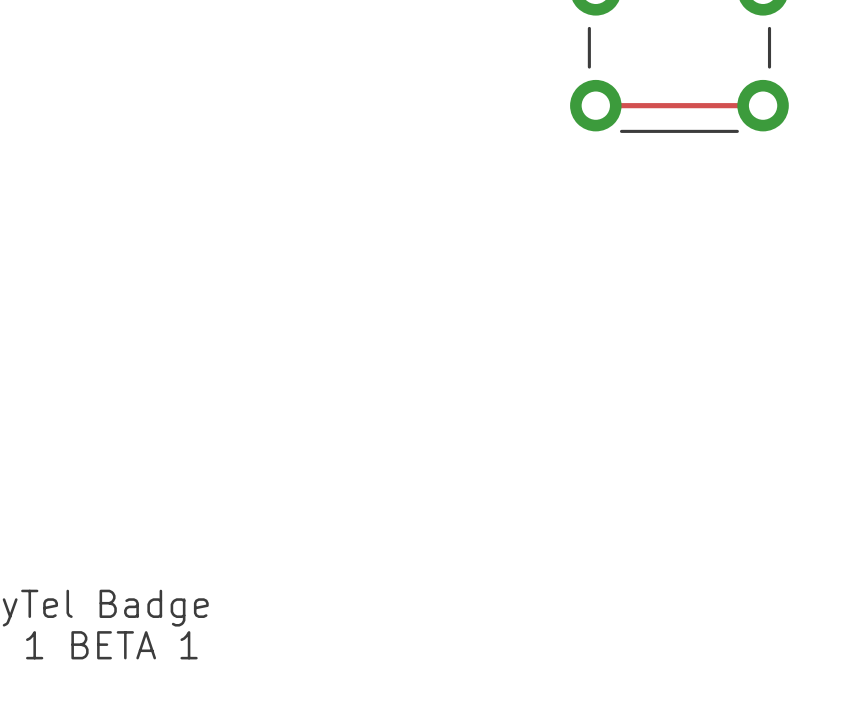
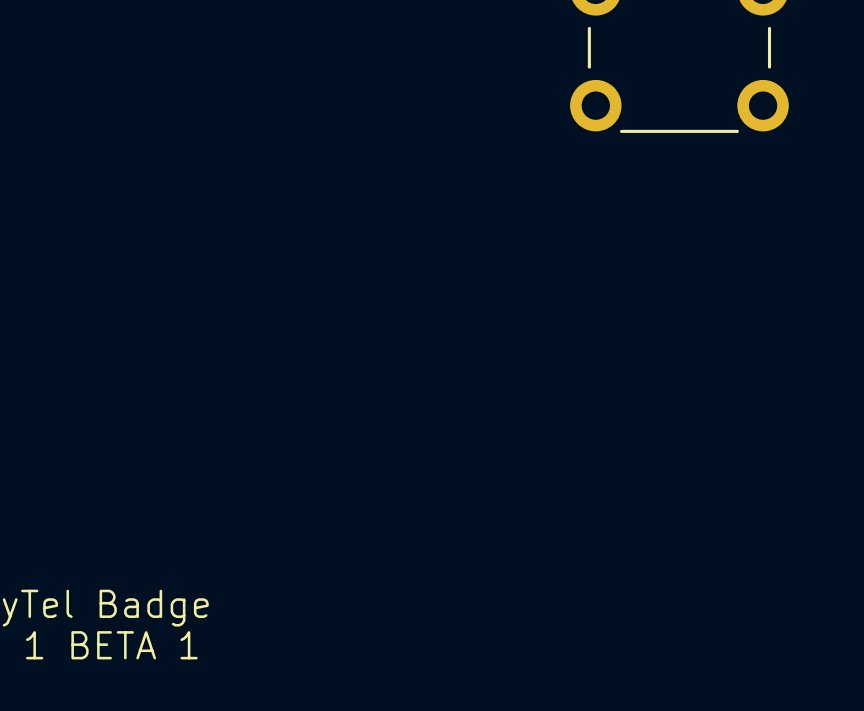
top track: (595, 105) (763, 105) -> none

